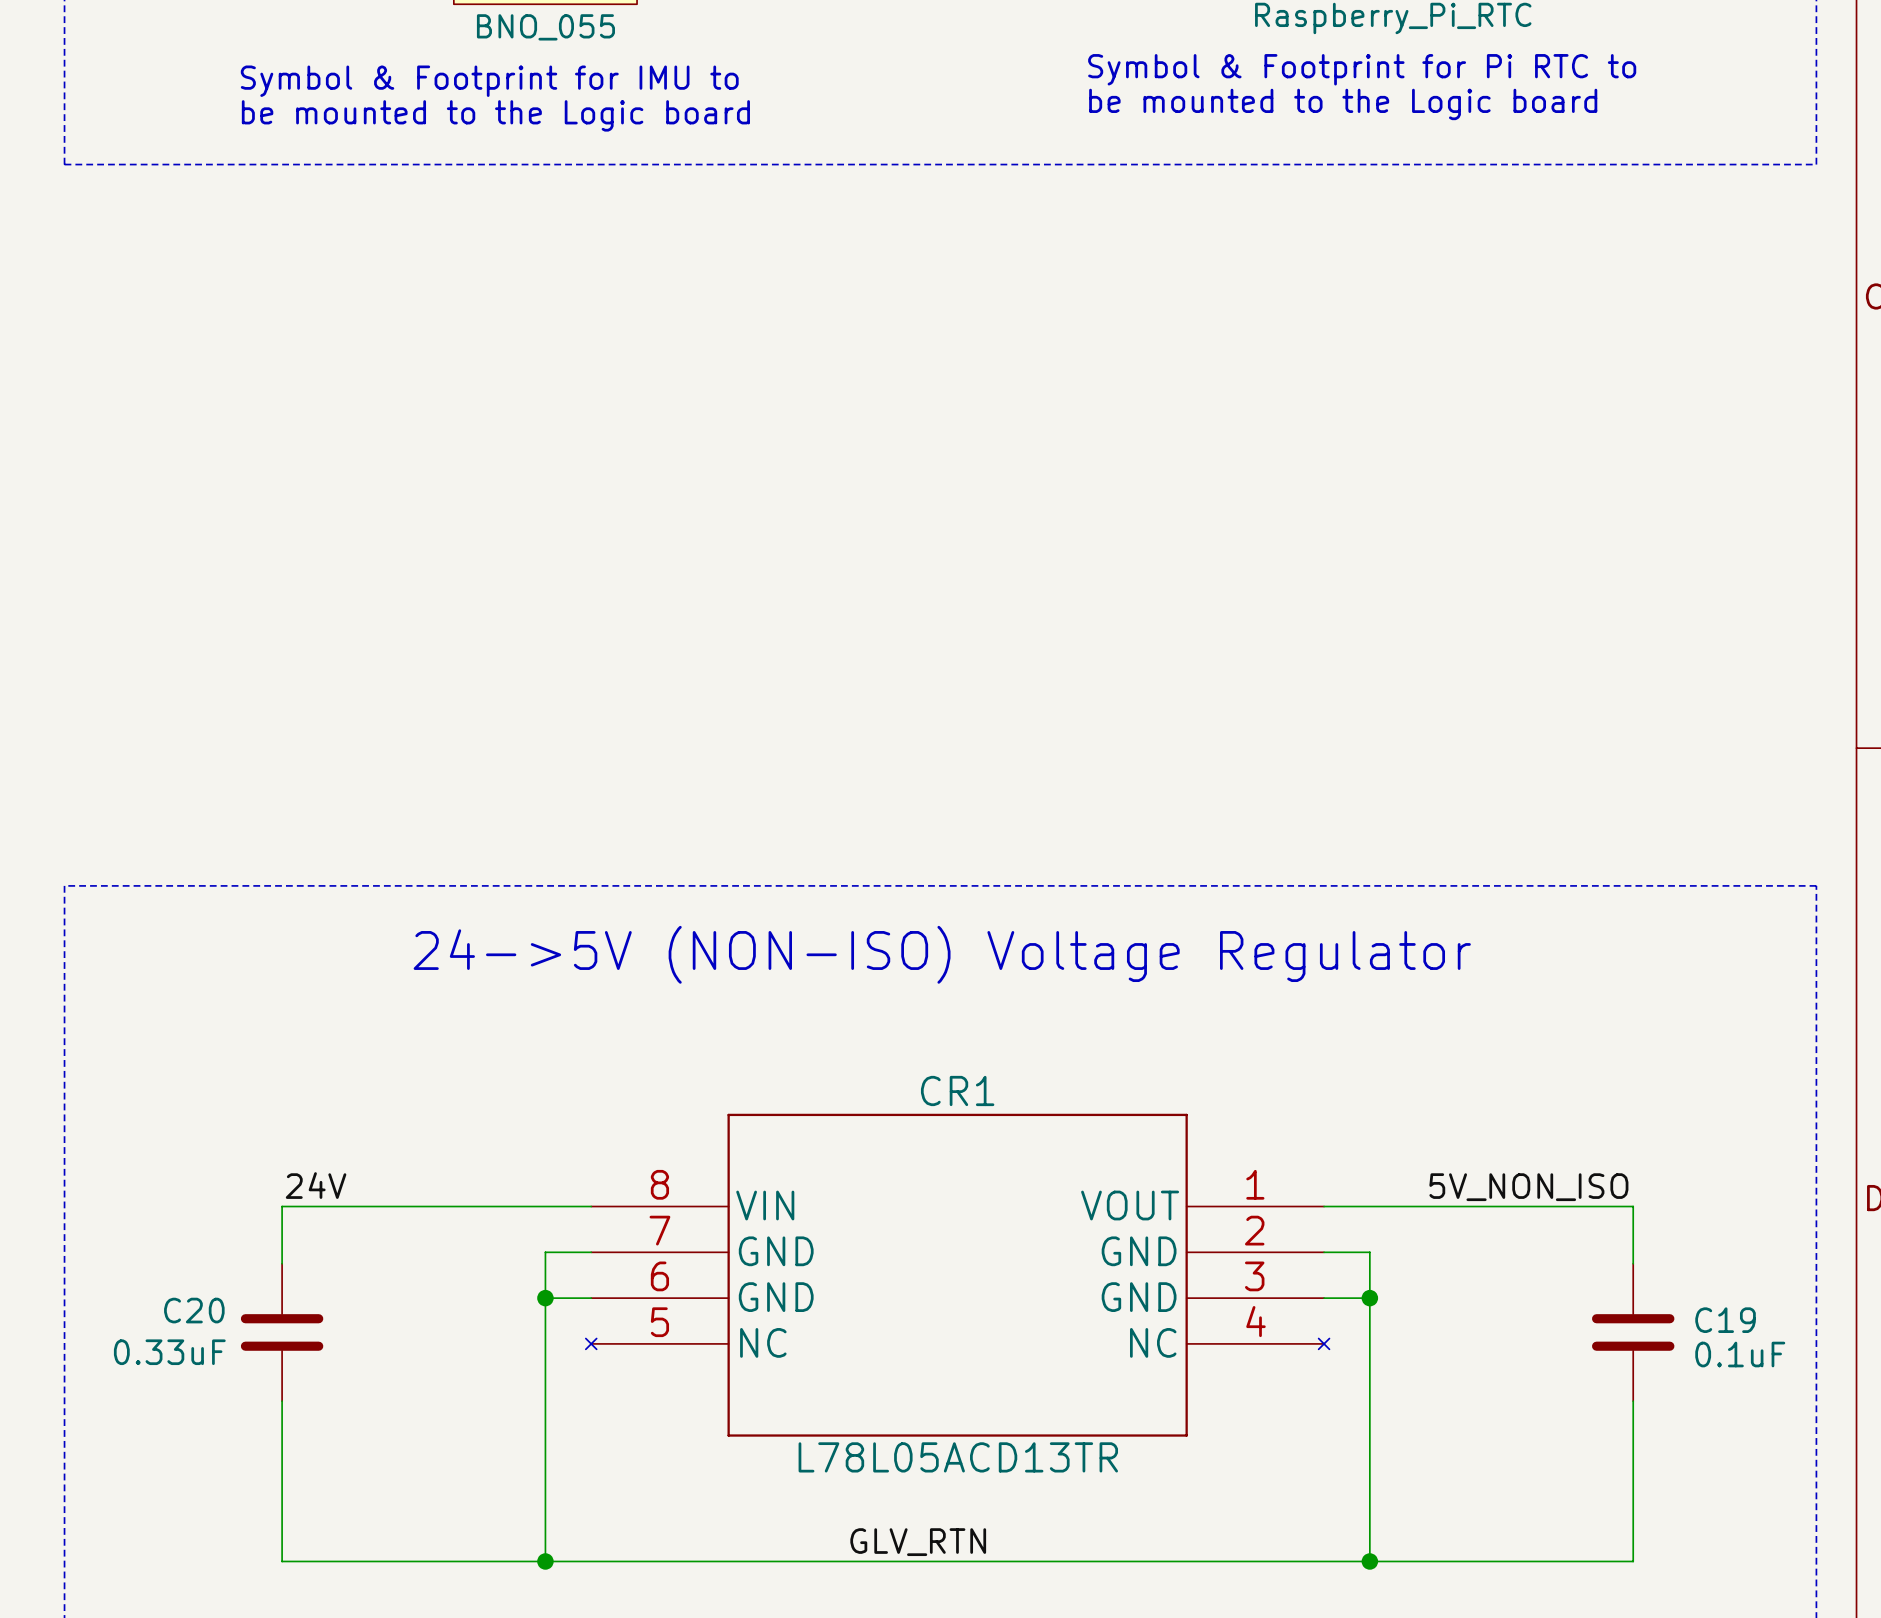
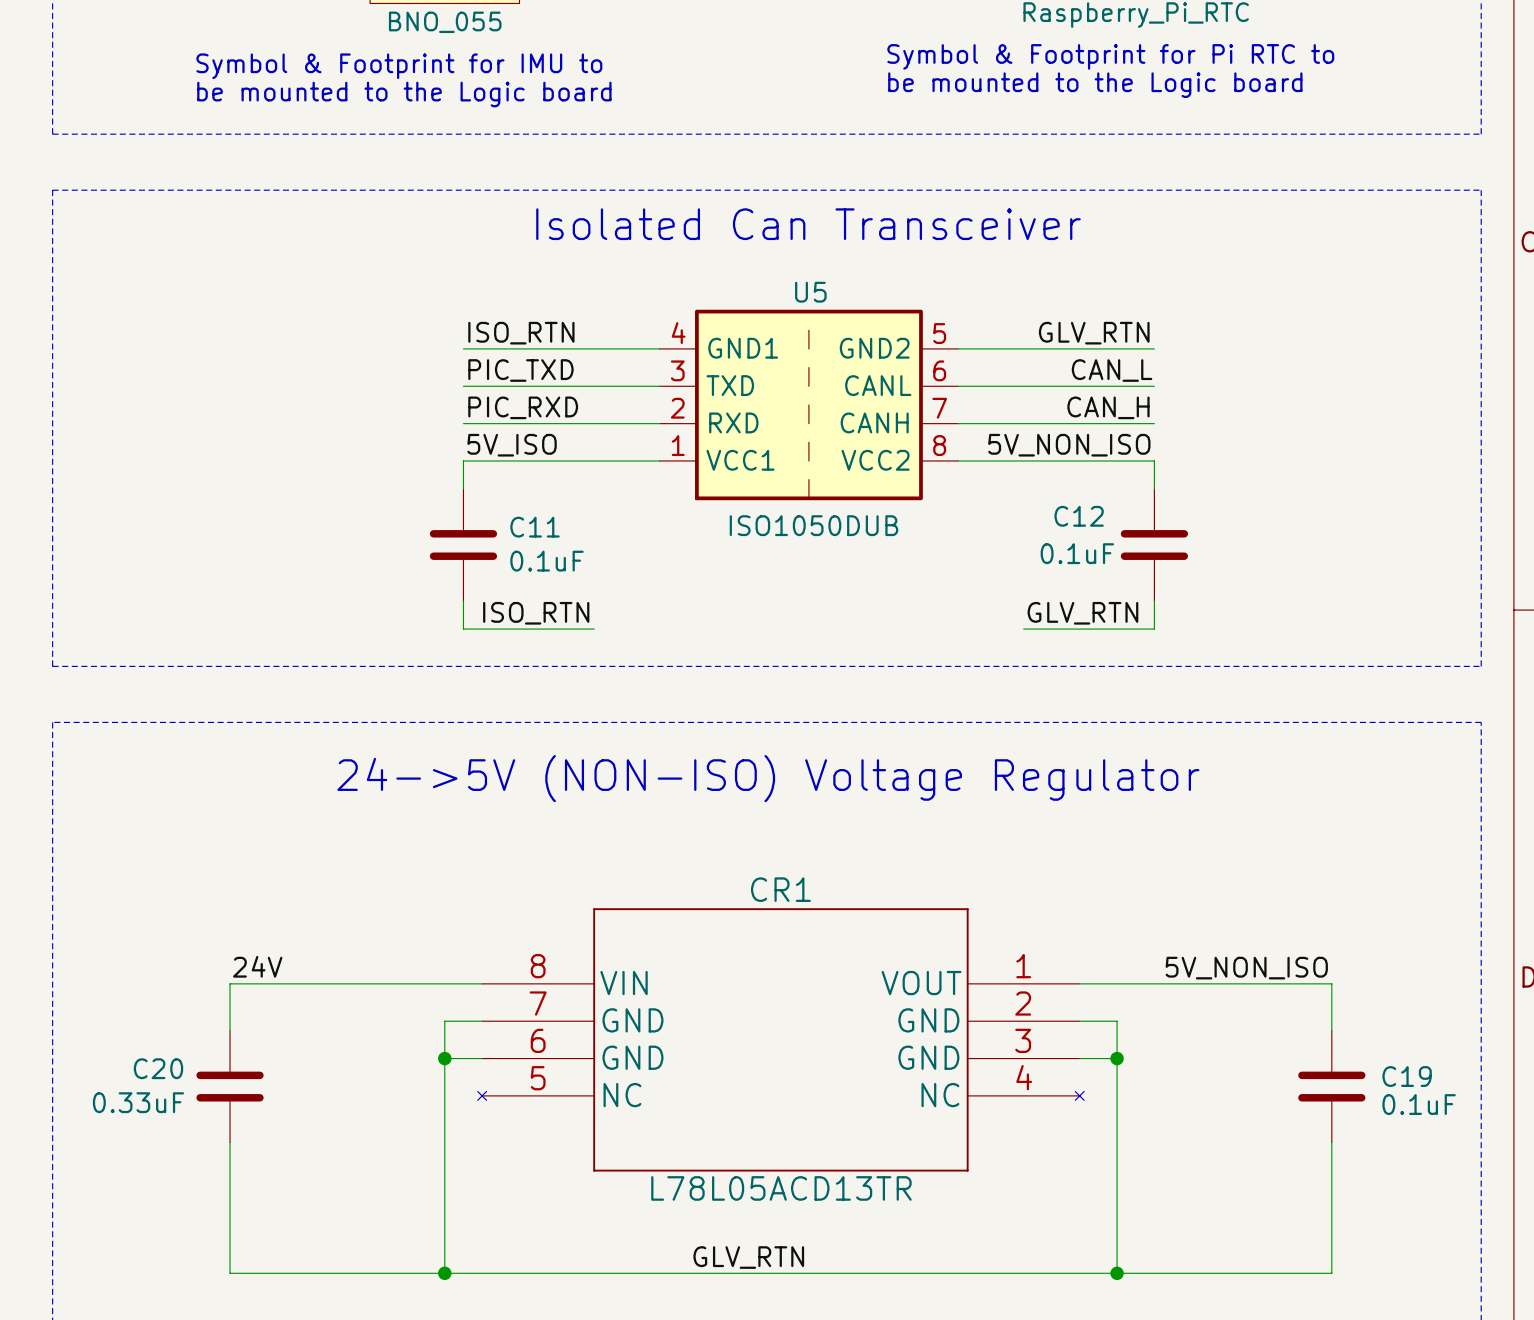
line: none -> (52, 190) (52, 666) (1481, 666) (1481, 190) (52, 190)
text: none -> Isolated Can Transceiver (808, 224)
label: none -> ISO_RTN (521, 333)
label: none -> GLV_RTN (1094, 333)
wire: none -> (463, 348) (659, 348)
wire: none -> (958, 348) (1154, 348)
label: none -> PIC_TXD (520, 370)
label: none -> CAN_L (1112, 370)
wire: none -> (463, 386) (659, 386)
wire: none -> (958, 386) (1154, 386)
U5: none -> ISO1050DUB (808, 404)
label: none -> PIC_RXD (523, 407)
label: none -> CAN_H (1108, 407)
wire: none -> (463, 423) (659, 423)
wire: none -> (958, 423) (1154, 423)
label: none -> 5V_ISO (512, 445)
label: none -> 5V_NON_ISO (1069, 445)
wire: none -> (659, 460) (463, 460) (463, 488)
wire: none -> (958, 460) (1154, 460) (1154, 488)
C11: none -> 0.1uF (463, 545)
C12: none -> 0.1uF (1154, 545)
wire: none -> (463, 601) (463, 629) (594, 629)
wire: none -> (1154, 601) (1154, 629) (1023, 629)
label: none -> ISO_RTN (536, 613)
label: none -> GLV_RTN (1082, 613)

